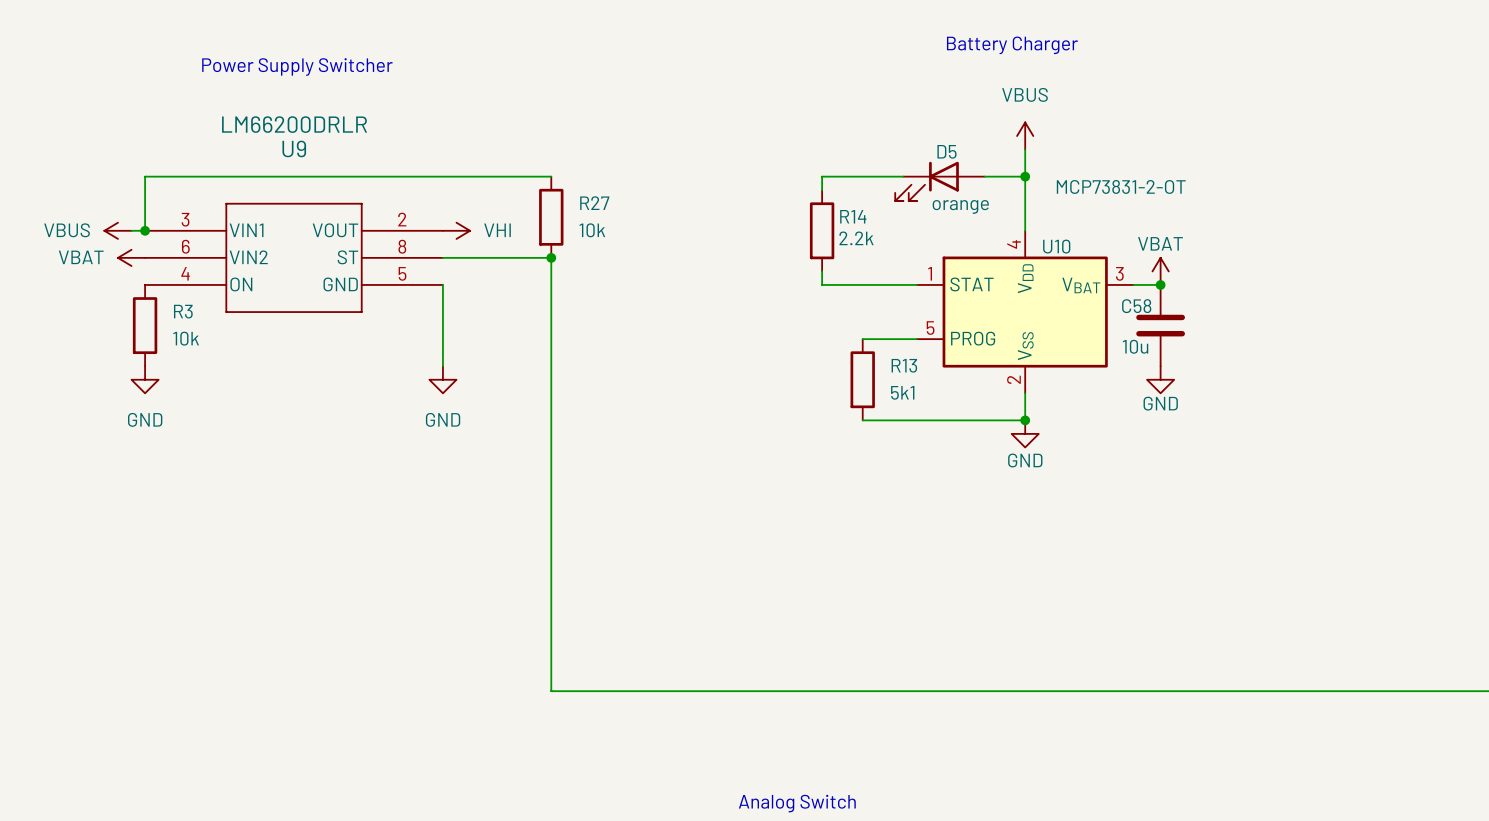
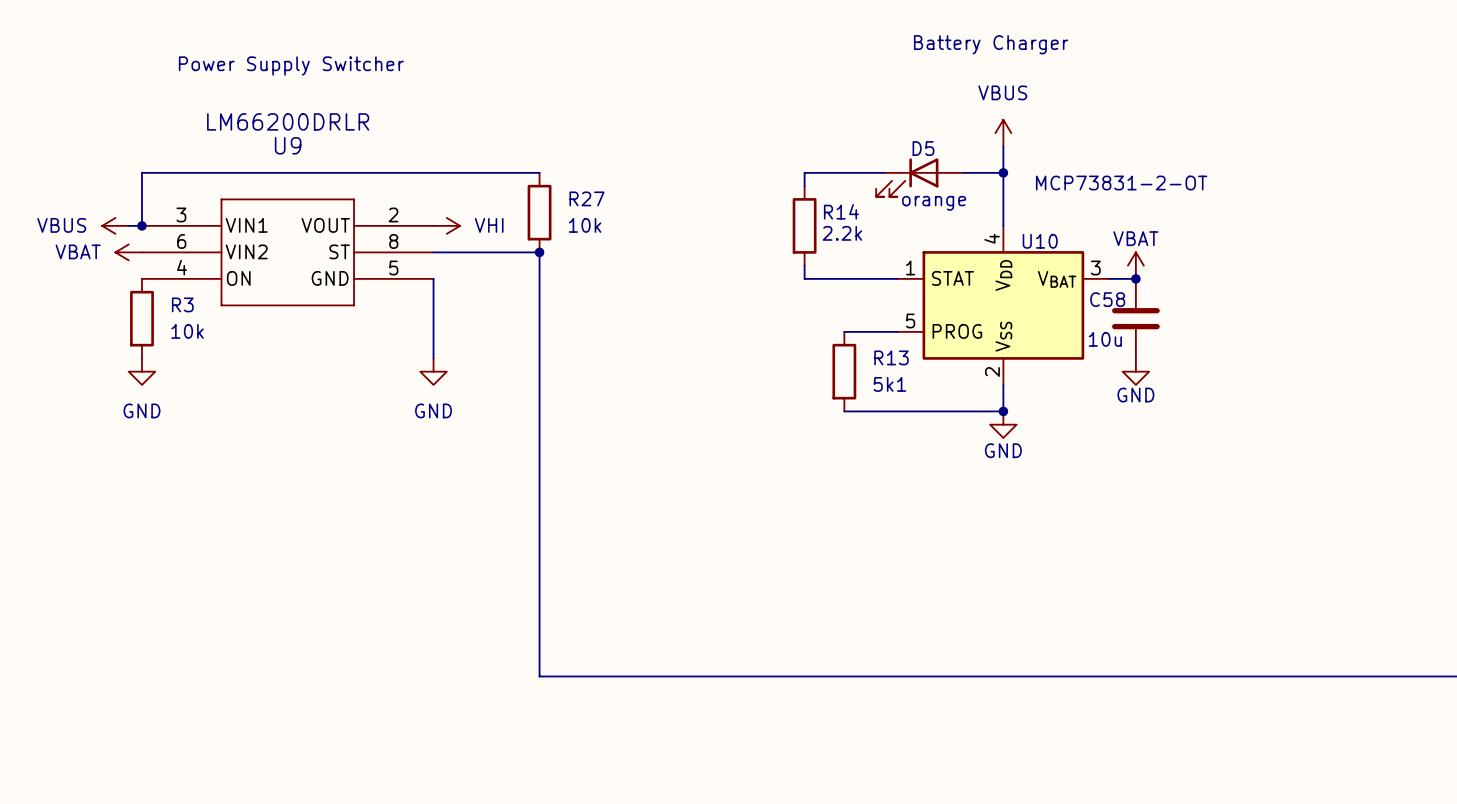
text: Analog Switch (797, 803) -> none

